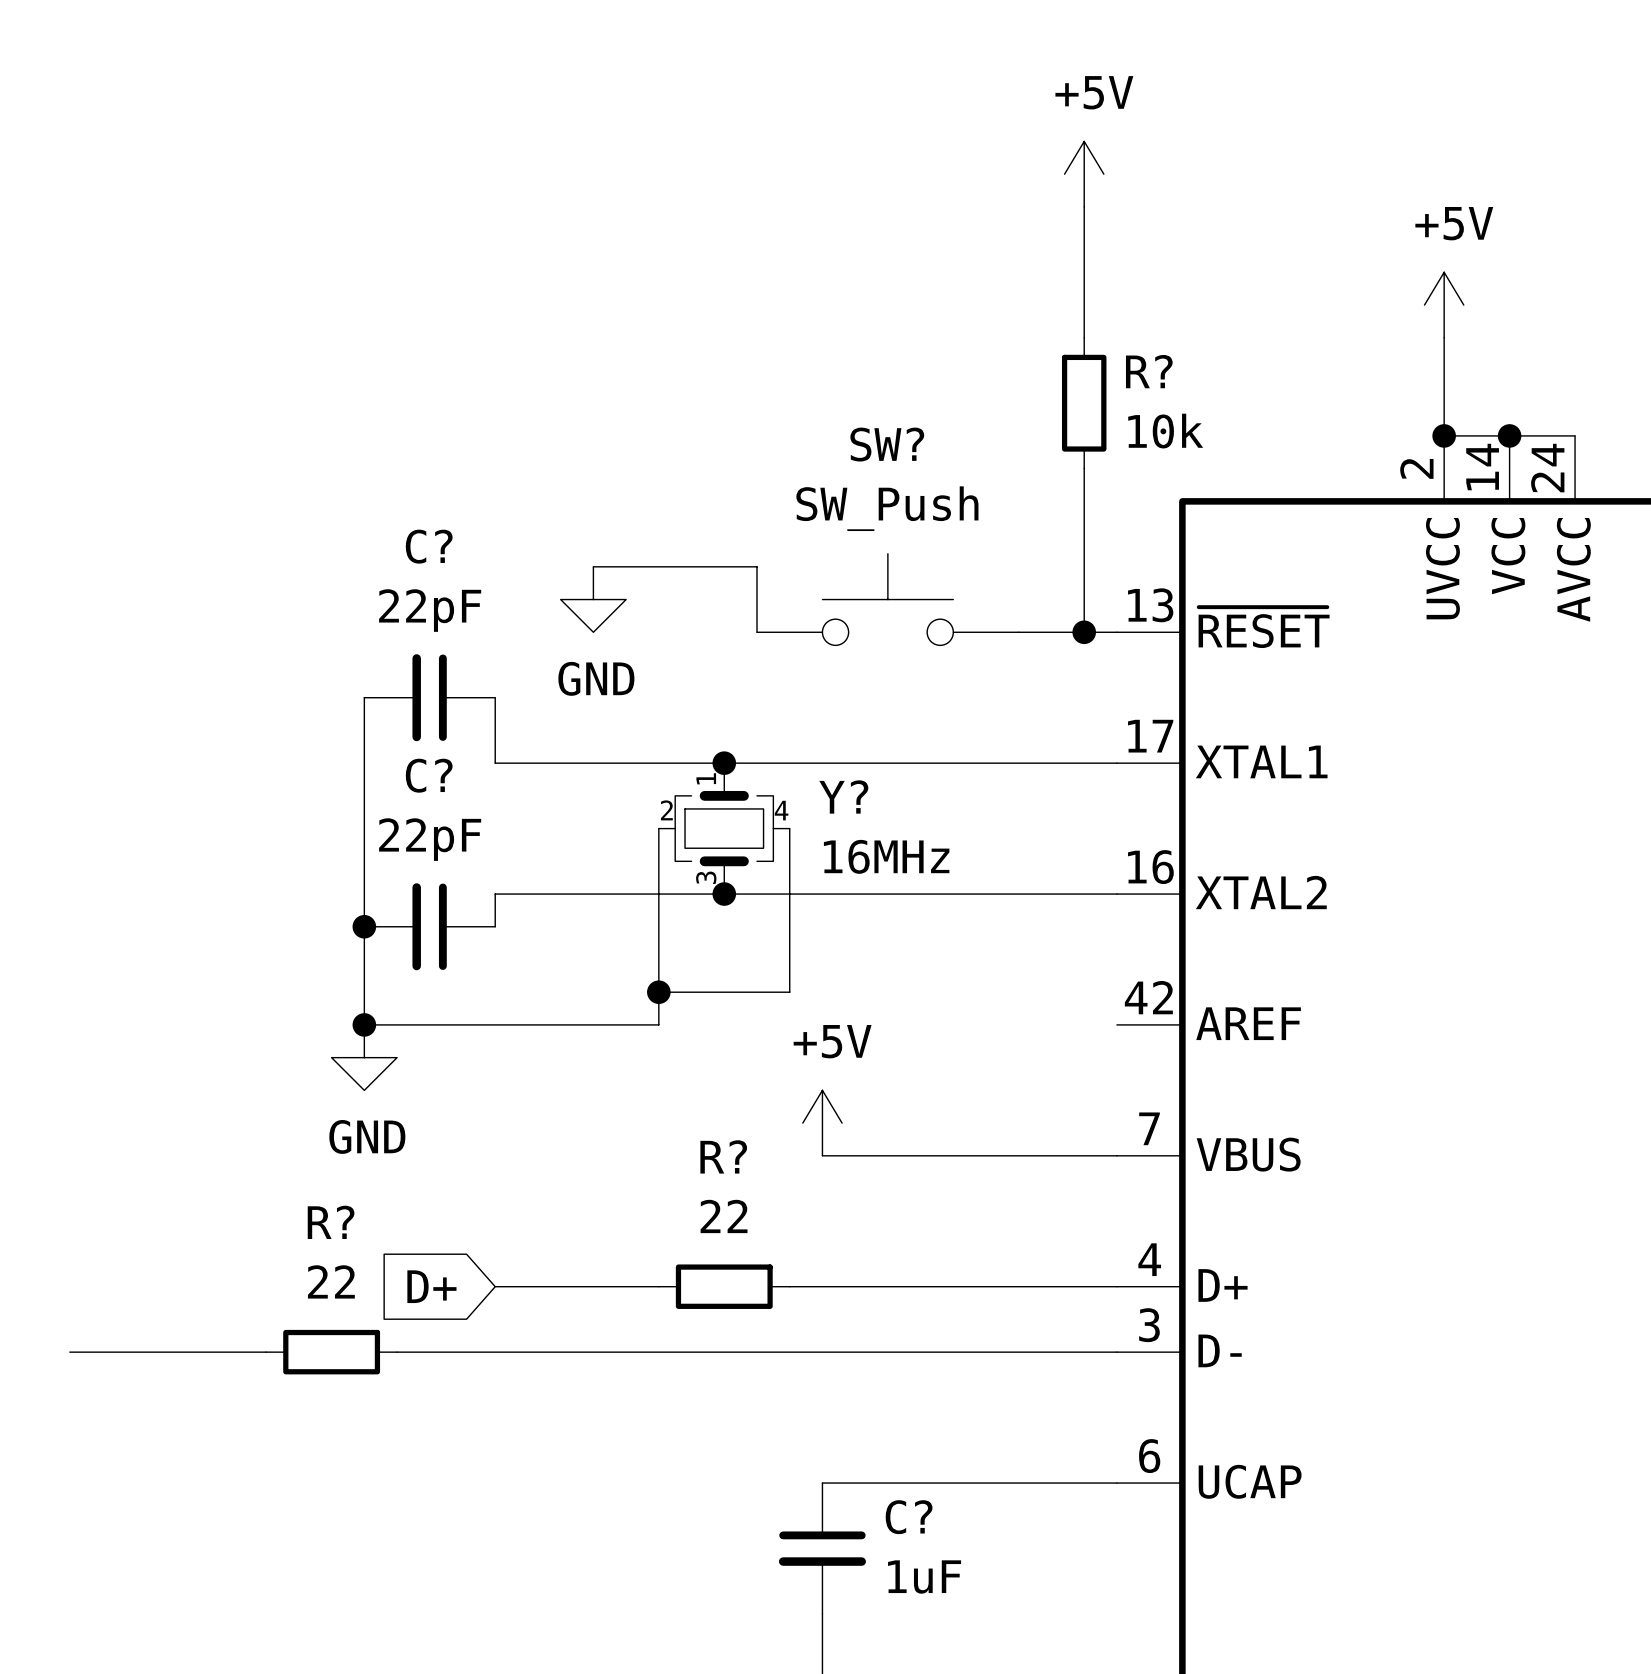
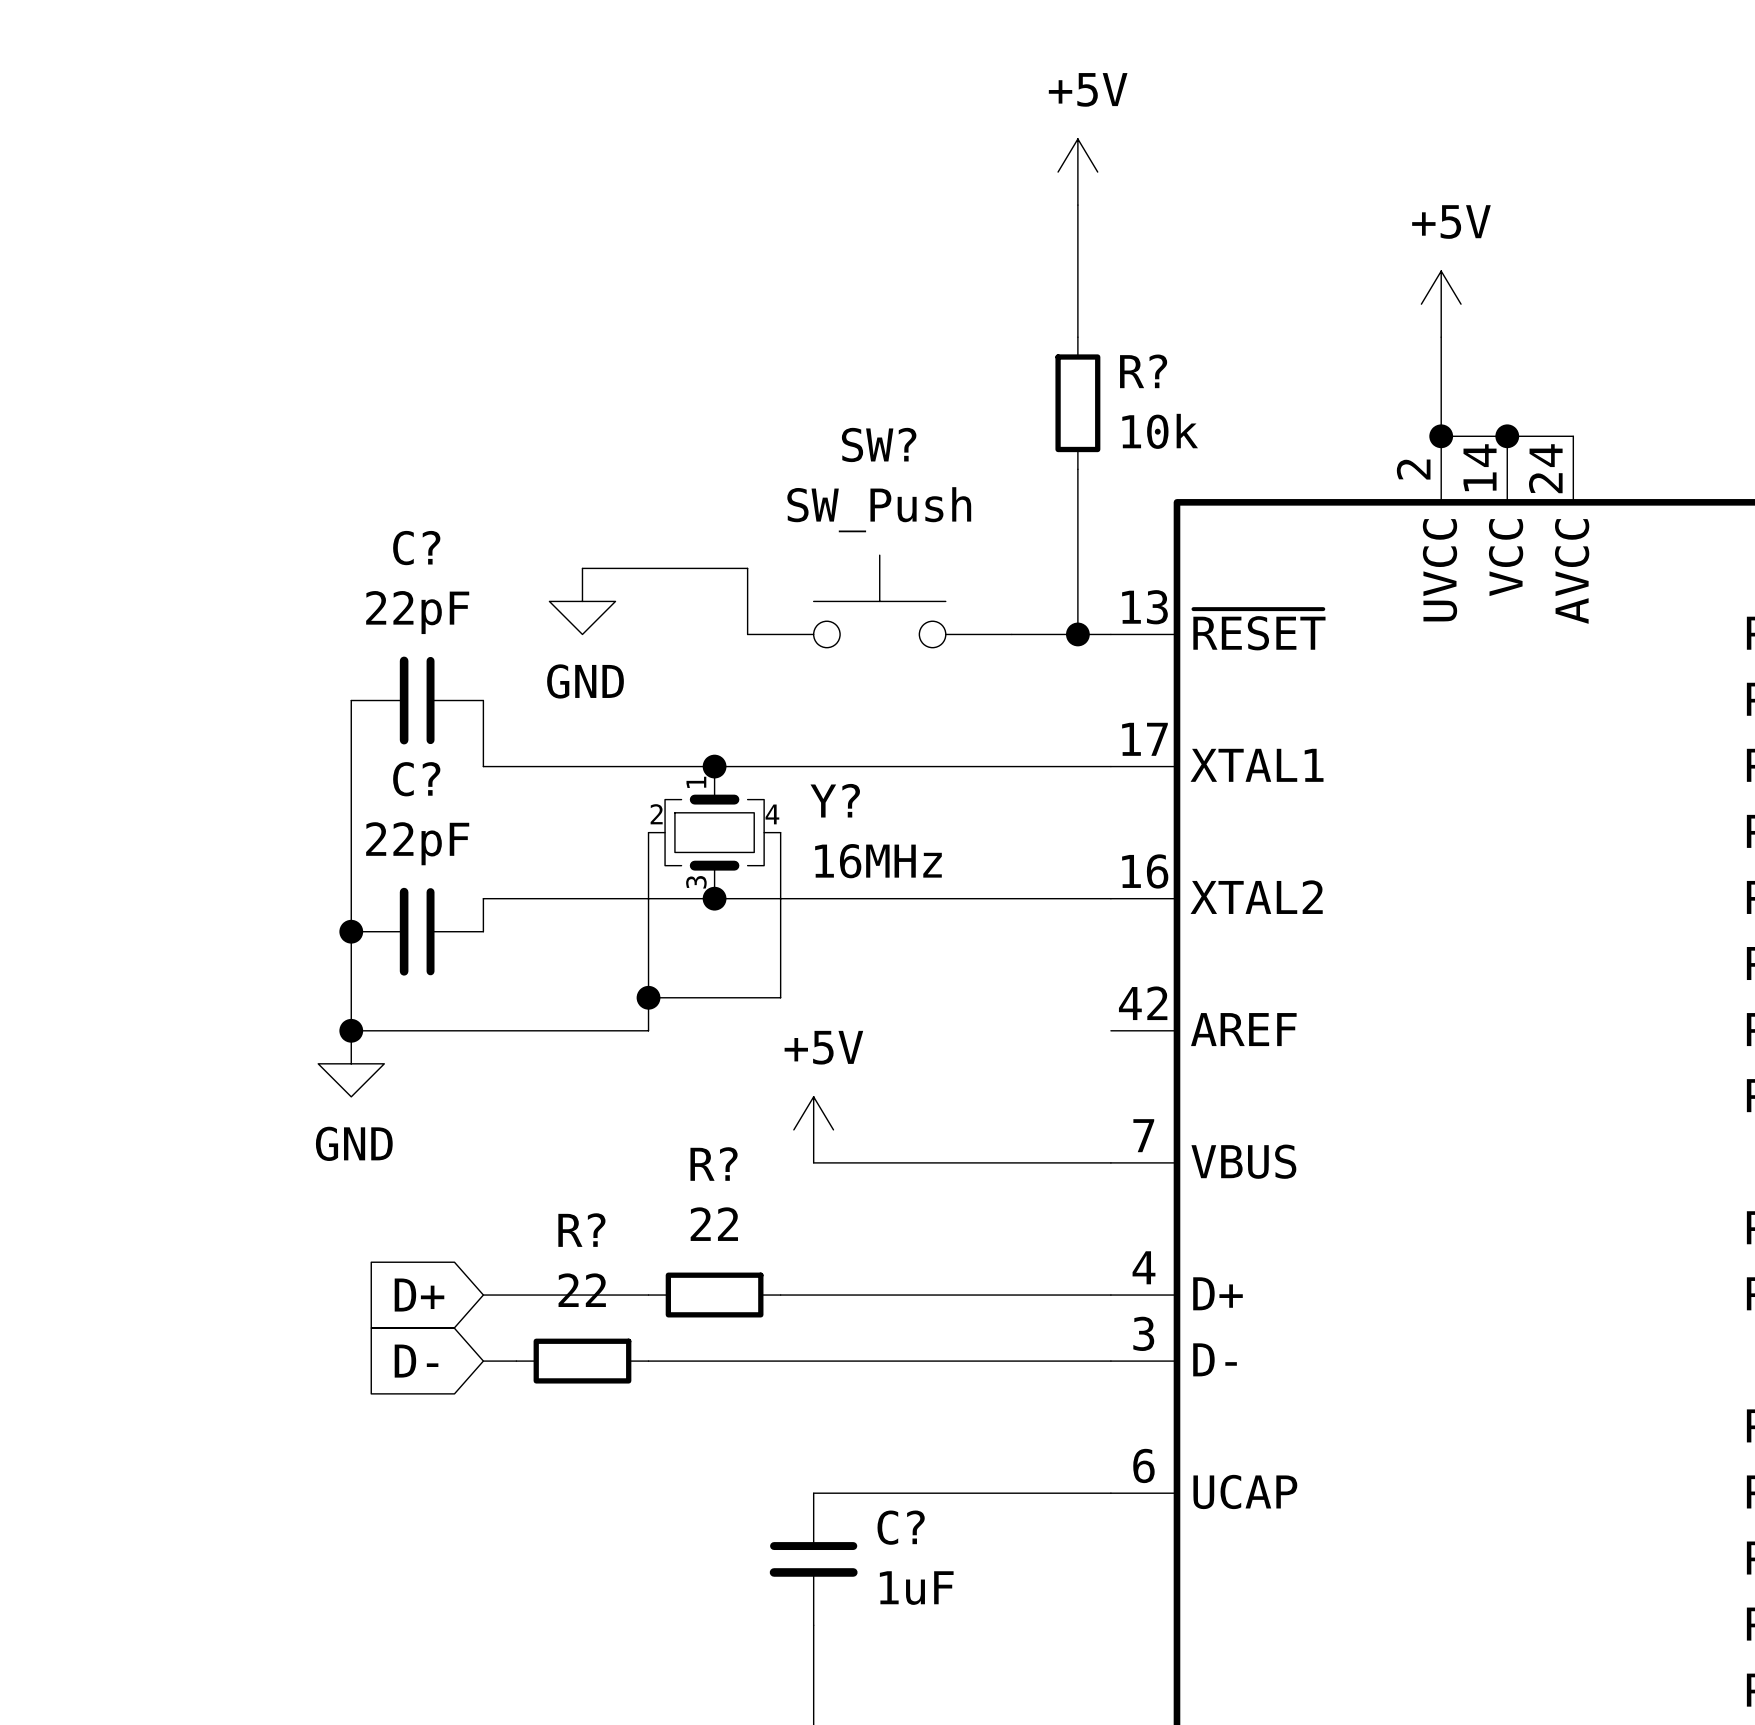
wire: (69, 1352) (266, 1352) -> none
R? position: (331, 1352) -> (582, 1361)
wire: (397, 1352) (495, 1352) -> none
global label: none -> D- (416, 1361)
wire: (527, 1352) (658, 1352) -> none

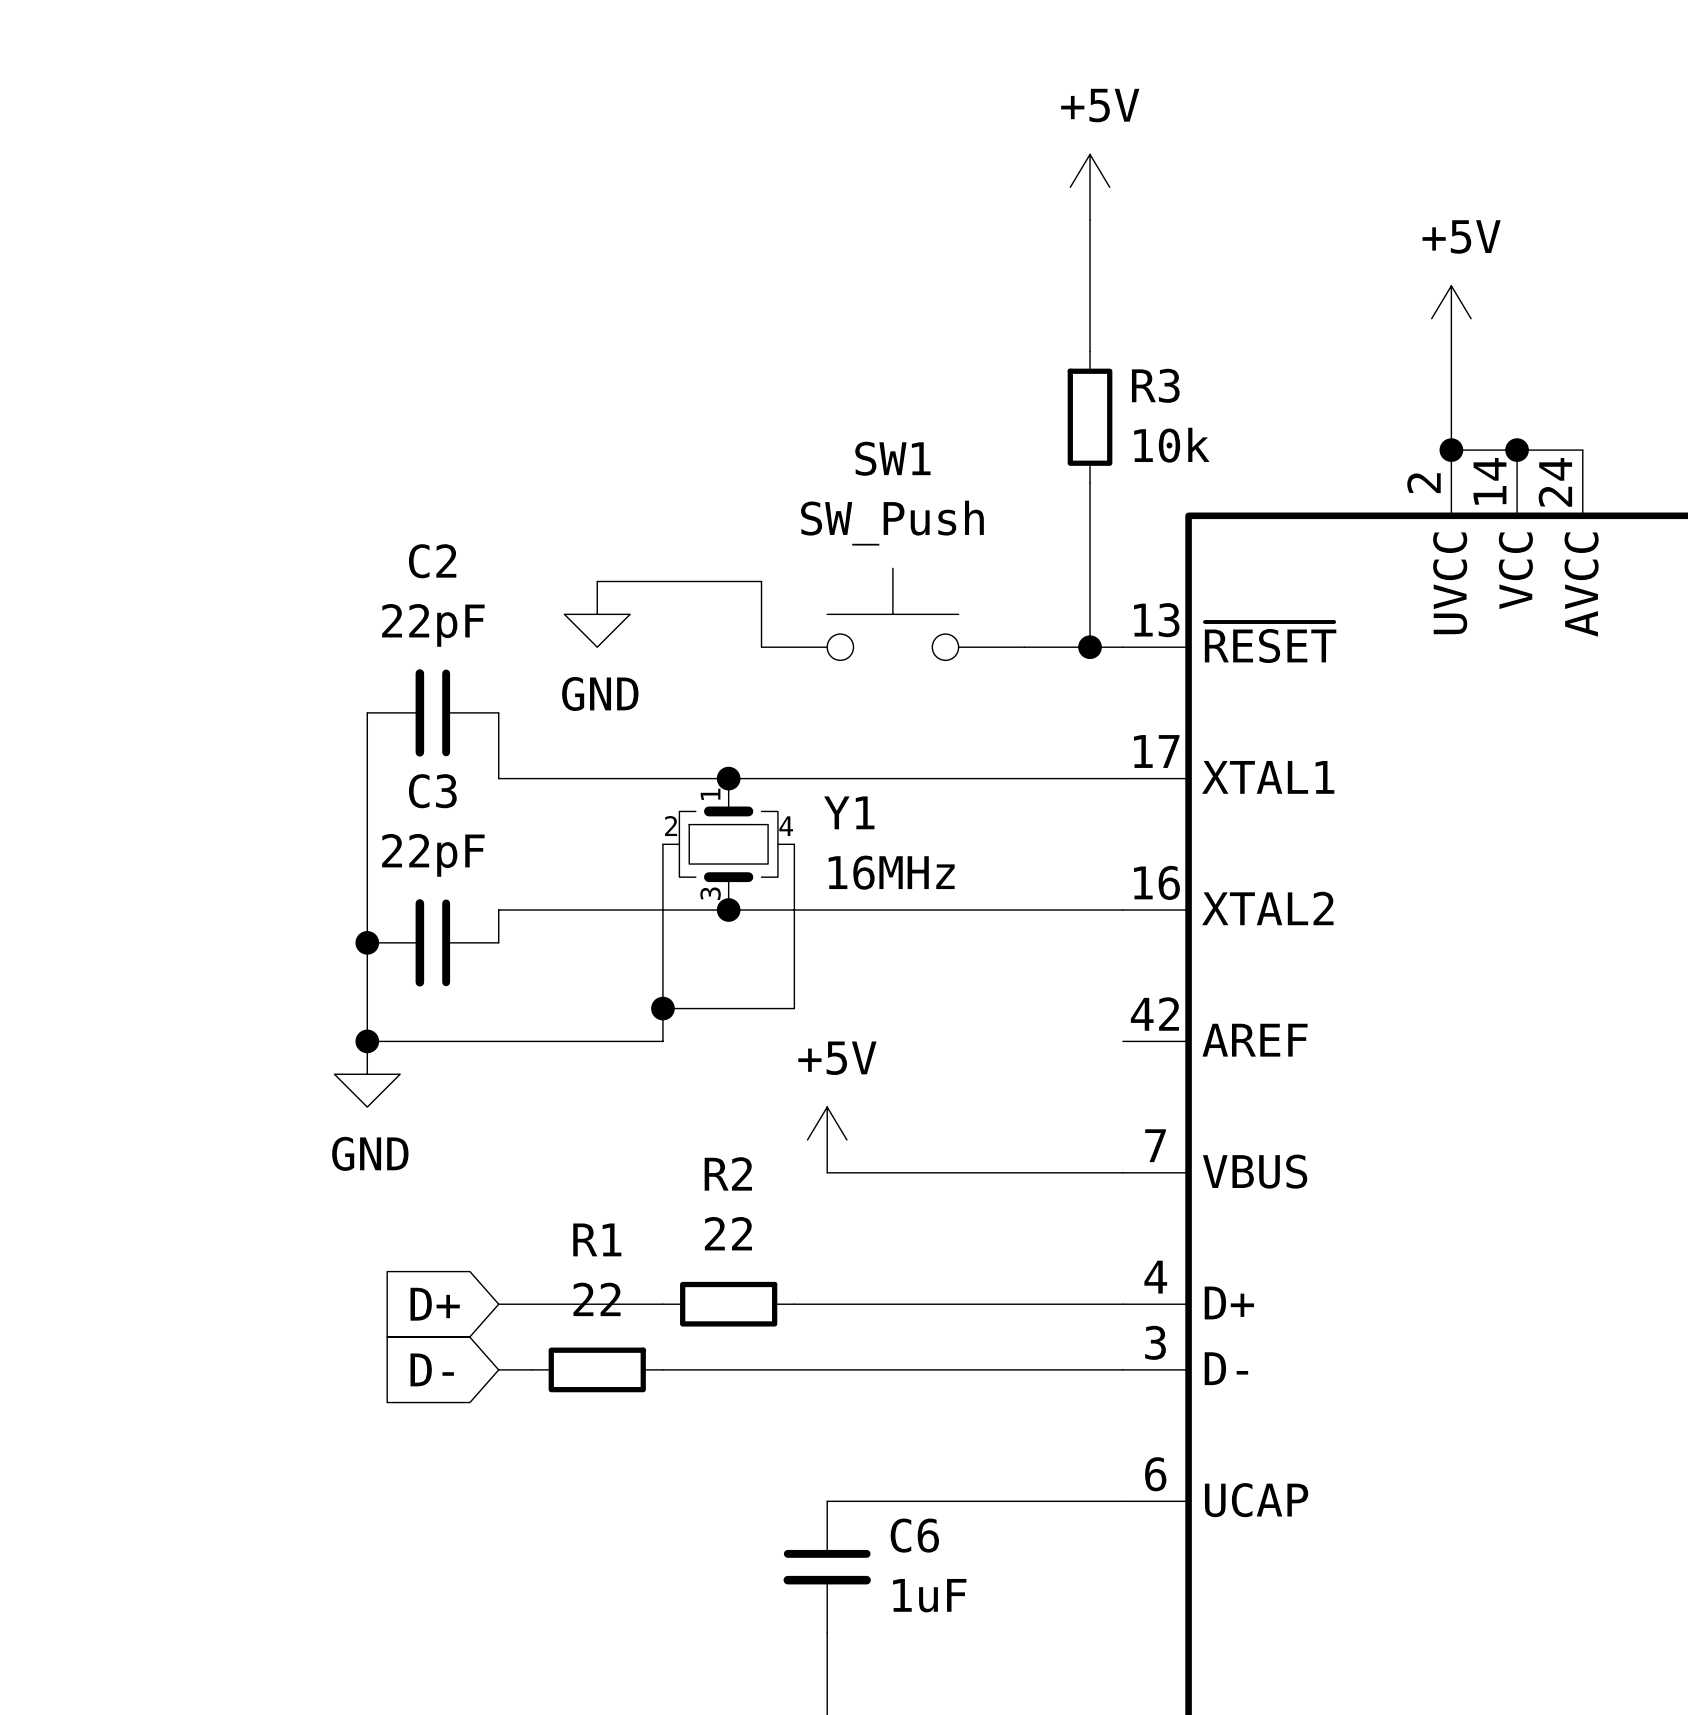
R? name: R? (1143, 371) -> R3 (1155, 385)
SW? name: SW? (879, 444) -> SW1 (892, 458)
C? name: C? (416, 548) -> C2 (432, 561)
C? name: C? (416, 779) -> C3 (432, 791)
Y? name: Y? (835, 800) -> Y1 (849, 812)
R? name: R? (714, 1164) -> R2 (728, 1173)
R? name: R? (581, 1230) -> R1 (597, 1239)
C? name: C? (901, 1527) -> C6 (914, 1535)

